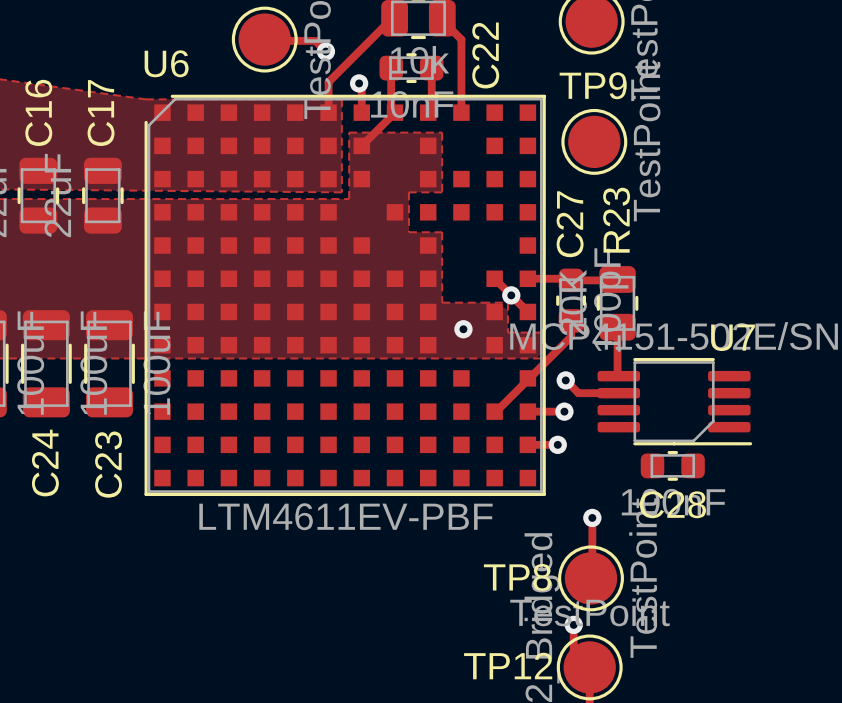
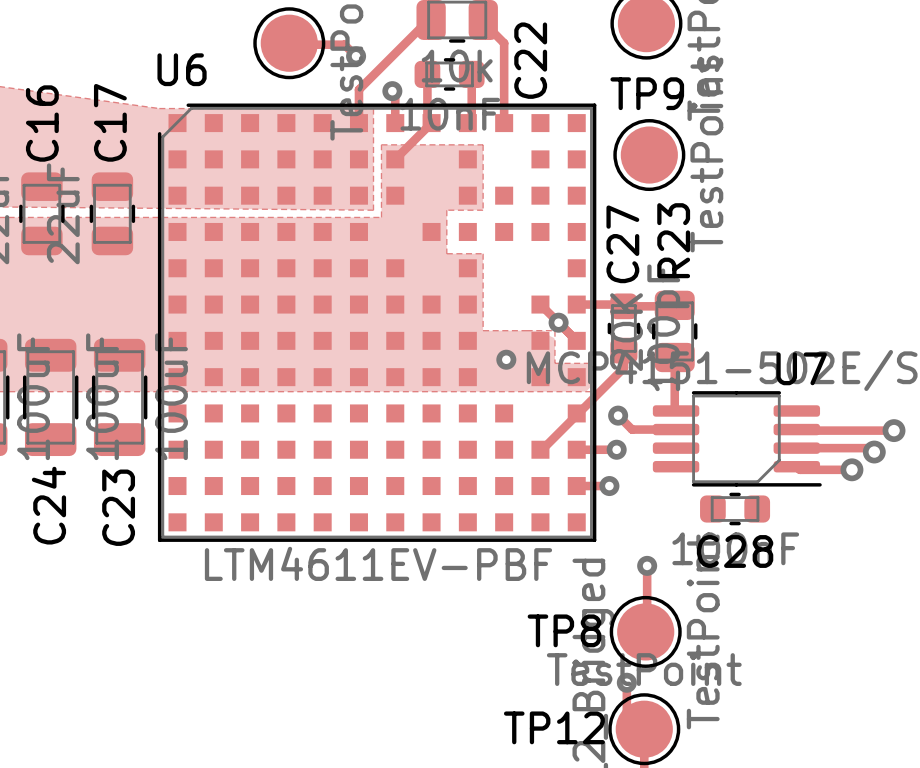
track: none -> (796, 429) (894, 430)
via: none -> (894, 430)
track: none -> (796, 448) (870, 448) (874, 452)
via: none -> (874, 452)
track: none -> (796, 466) (799, 469) (851, 469)
via: none -> (851, 469)

